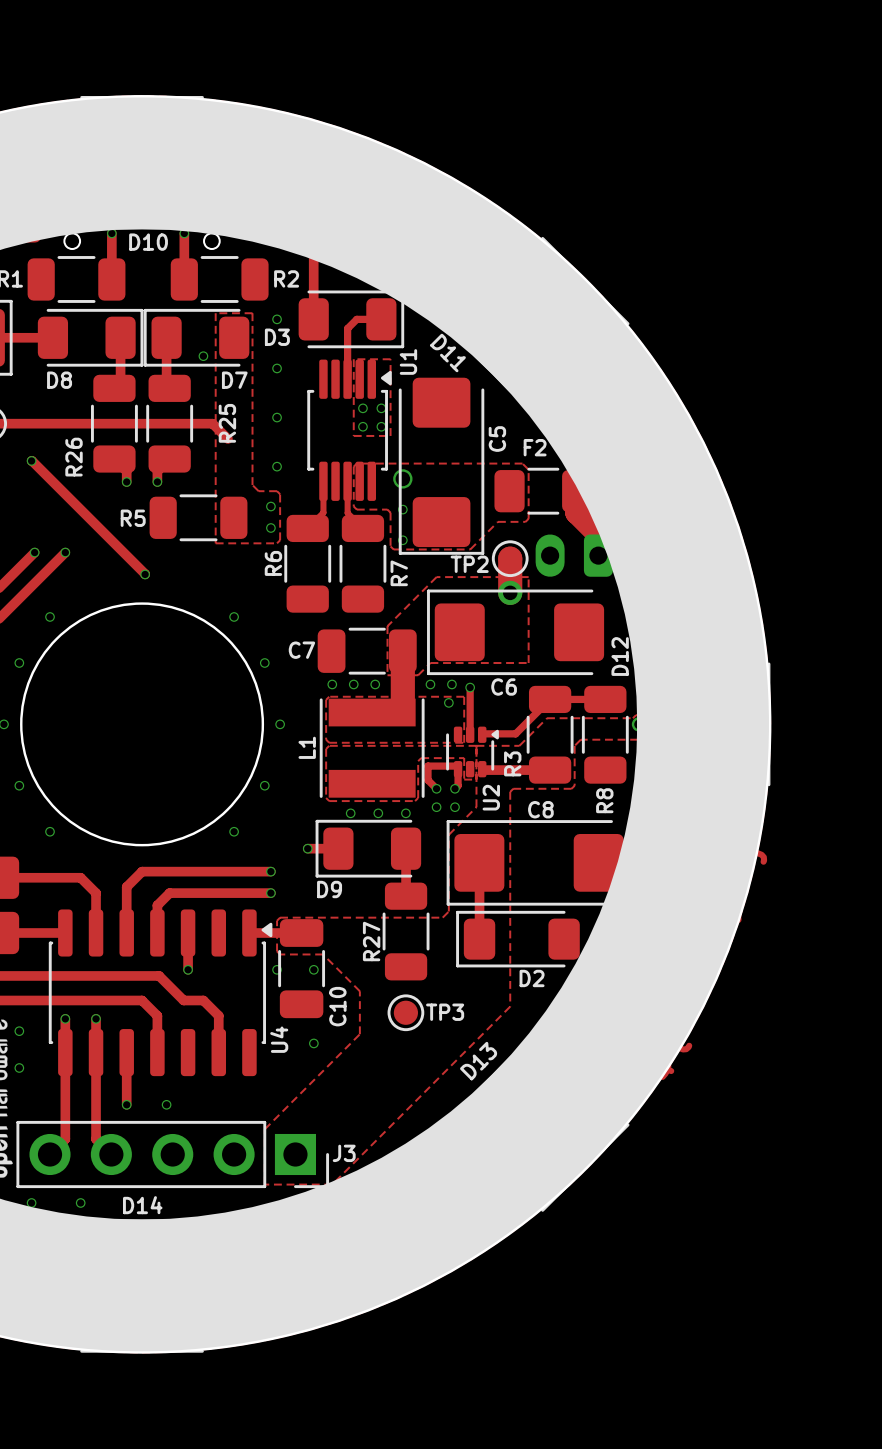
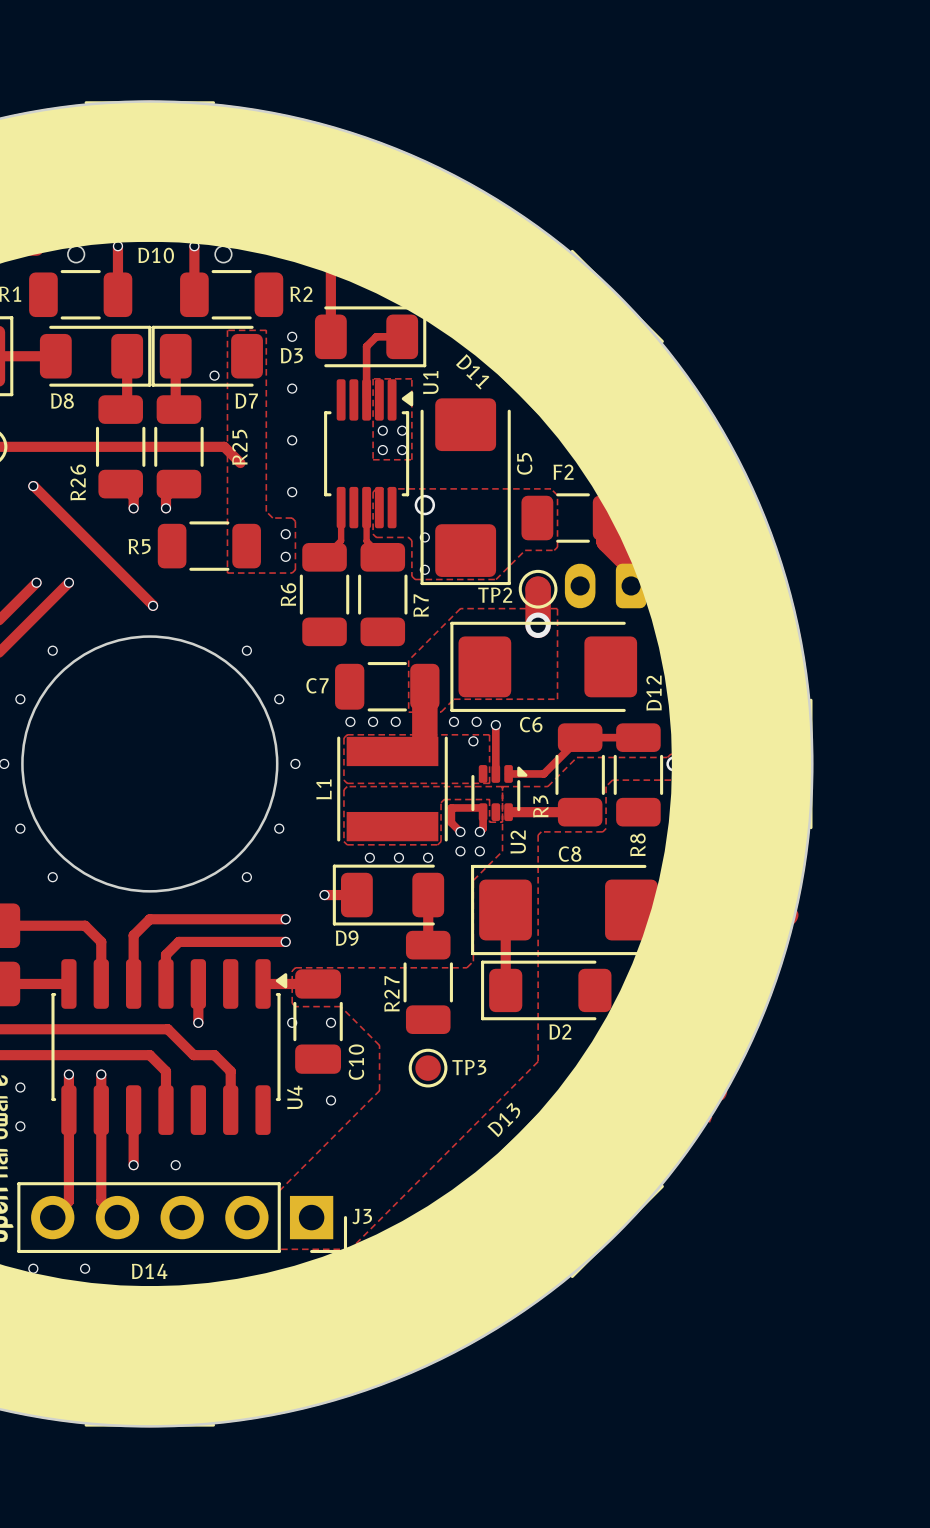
U2 footprint: [446, 726, 499, 778] -> [471, 765, 528, 822]

